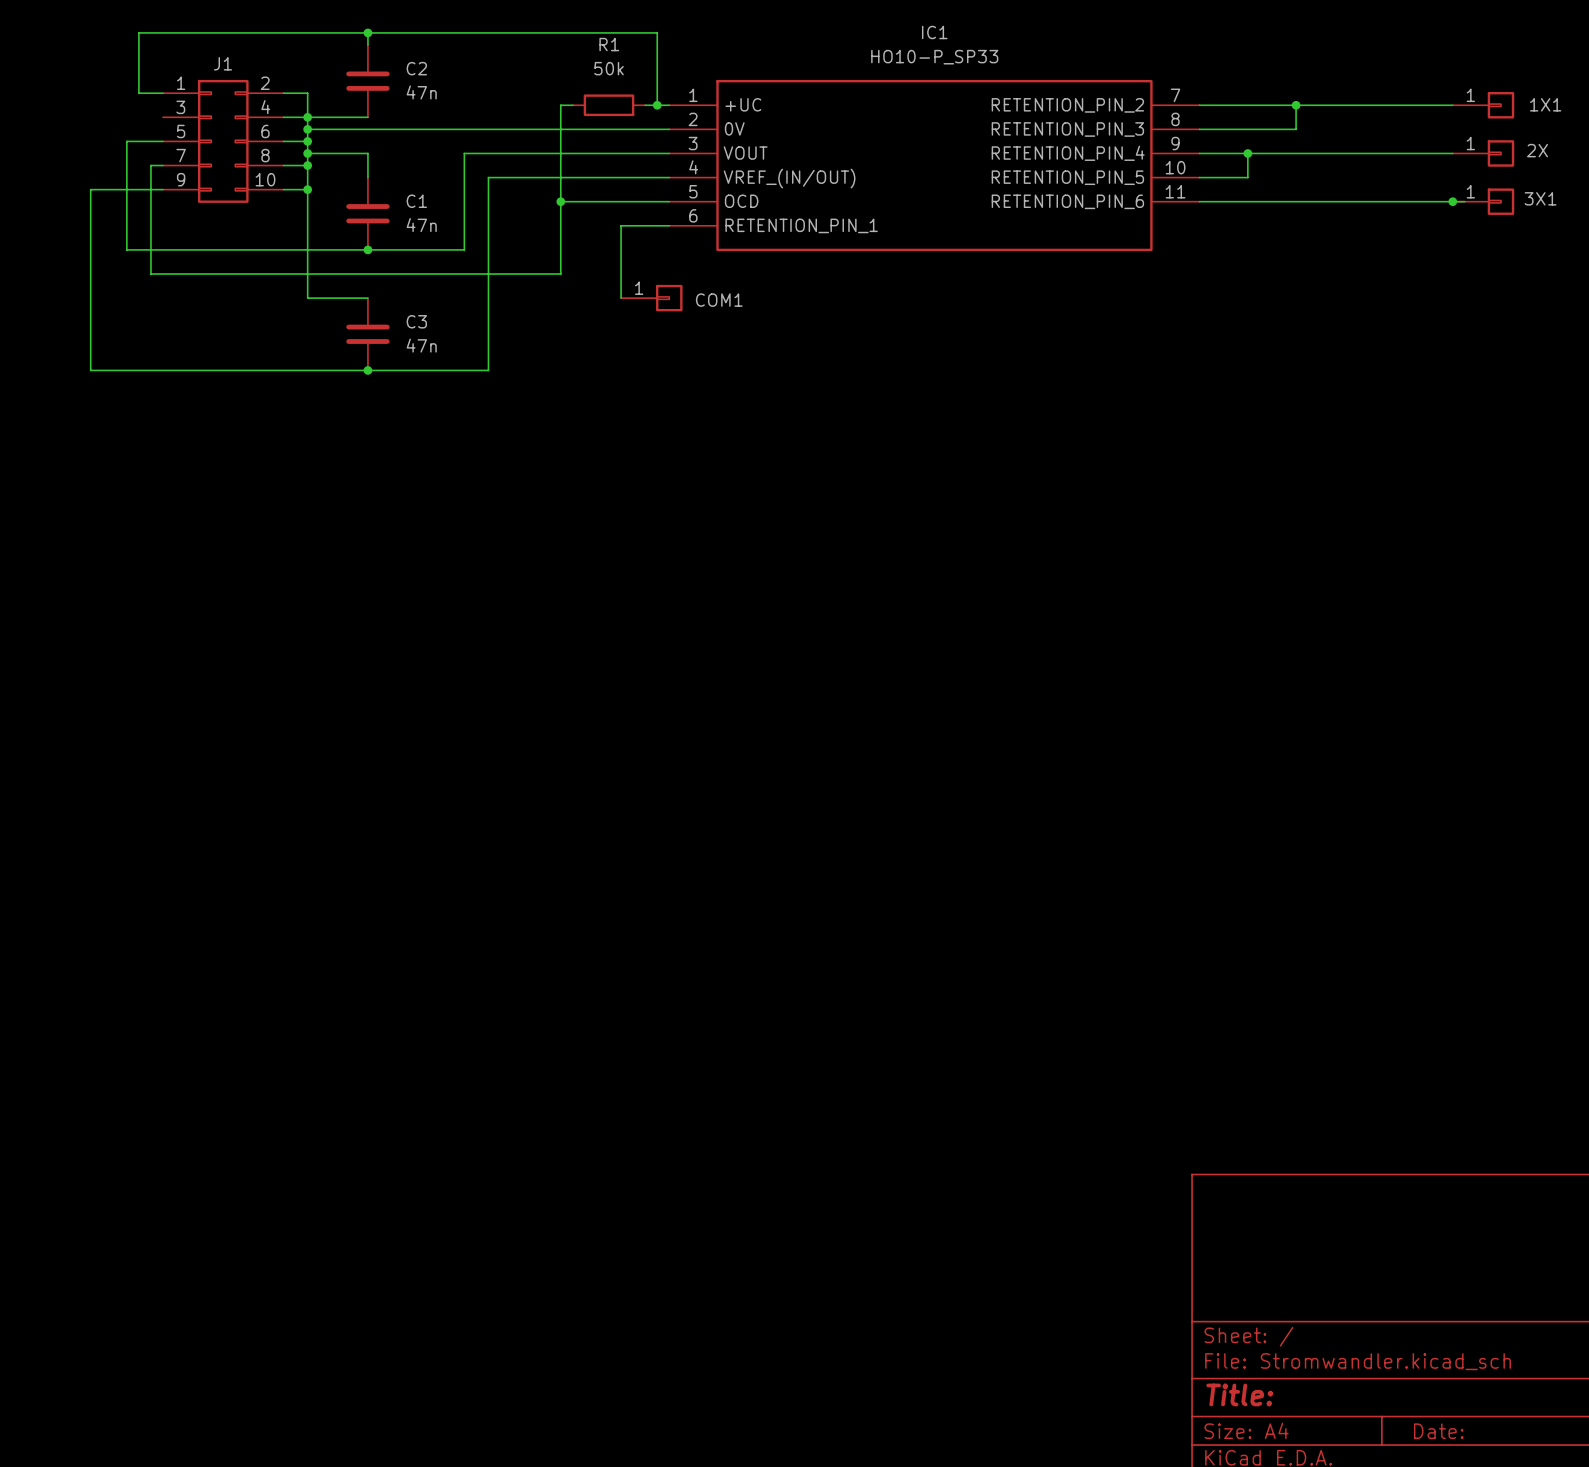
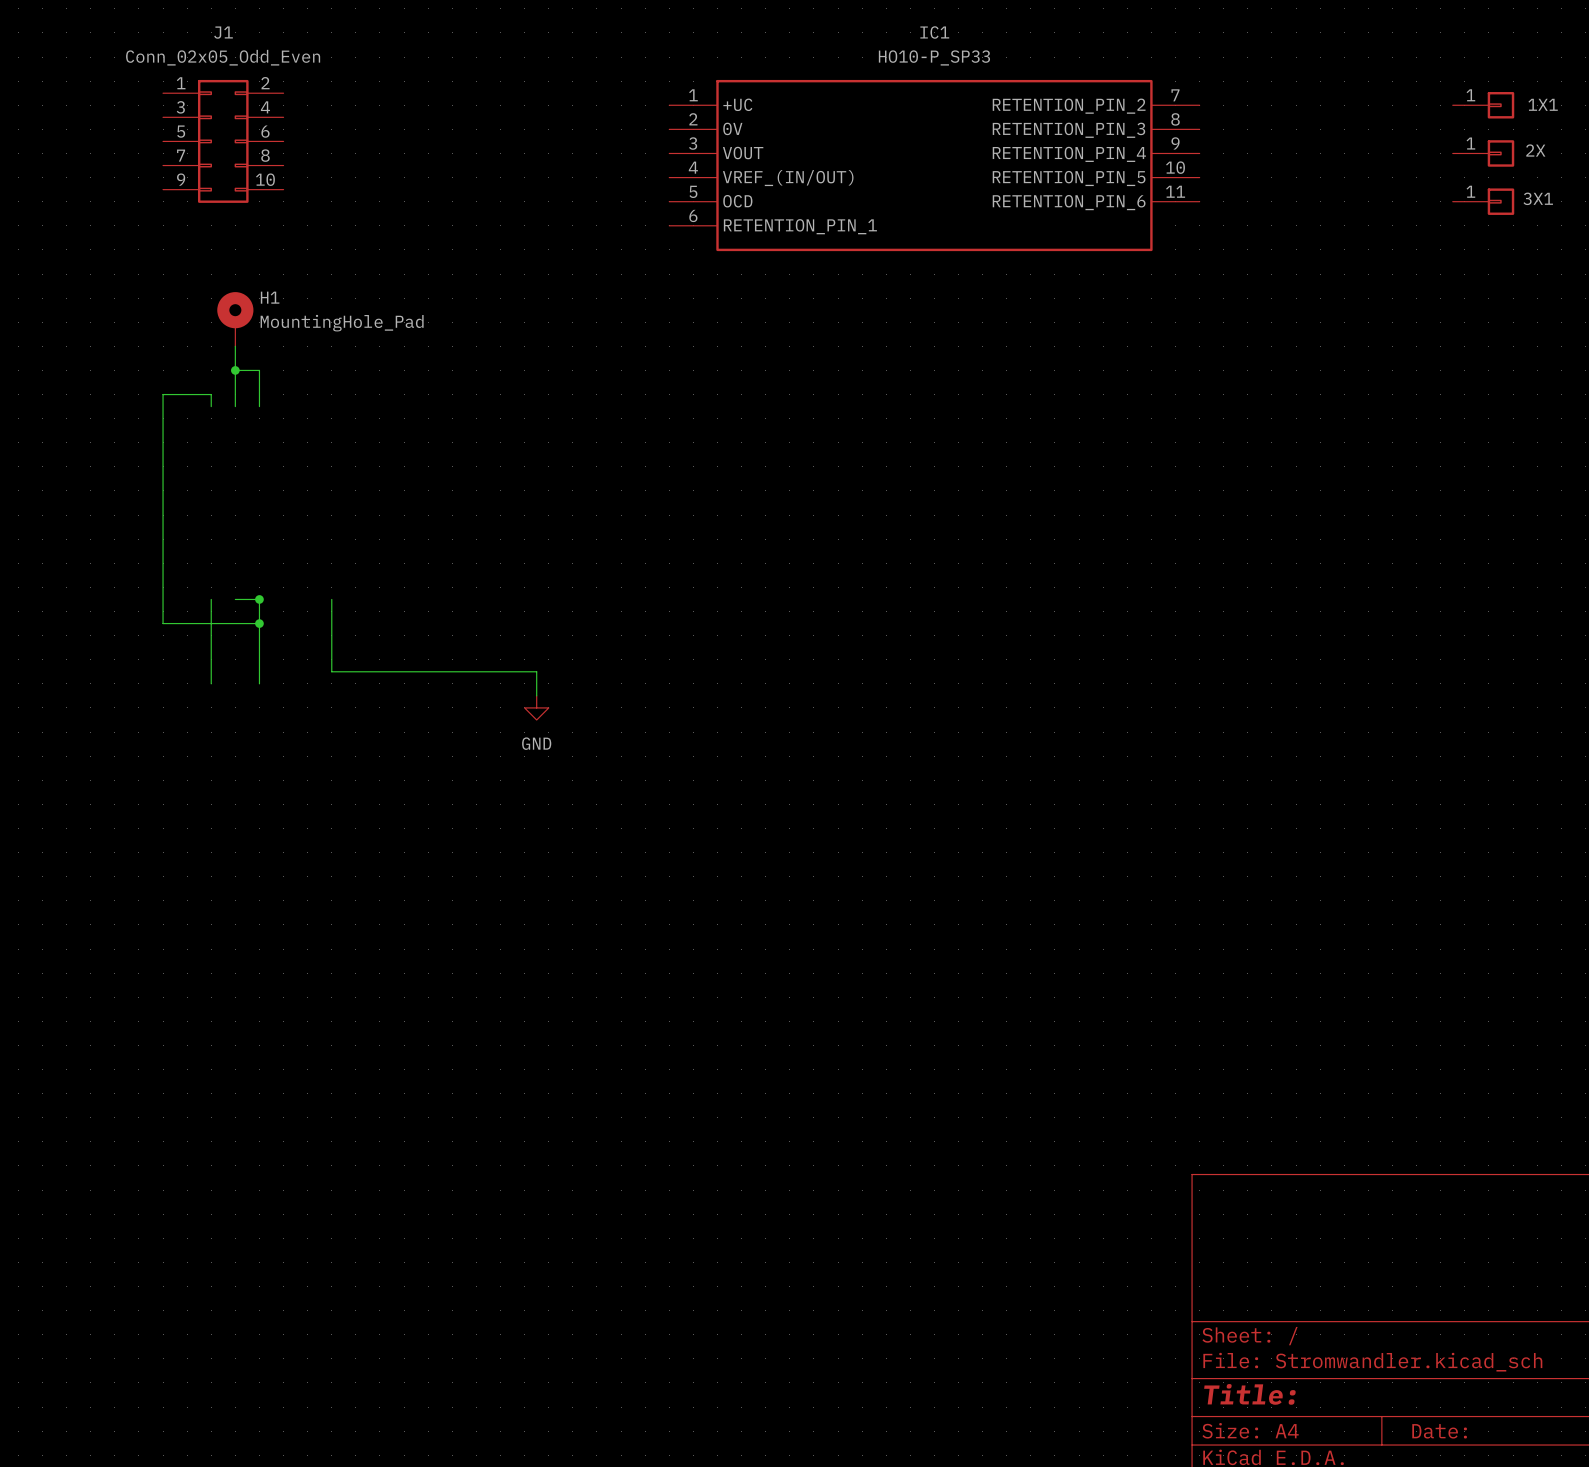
wire: (367, 32) (367, 44) -> none
junction: (367, 32) -> none
J1 value: none -> Conn_02x05_Odd_Even (223, 57)
J1 name position: J1 (223, 63) -> J1 (223, 32)
C2: 47n (367, 81) -> none
wire: (163, 93) (138, 93) (138, 32) (657, 32) (657, 105) -> none
wire: (283, 93) (307, 93) (307, 298) (367, 298) -> none
wire: (572, 105) (560, 105) (560, 274) (150, 274) (150, 165) (163, 165) -> none
R1: 50k (609, 105) -> none
wire: (645, 105) (669, 105) -> none
junction: (657, 105) -> none
wire: (1199, 105) (1452, 105) -> none
wire: (1296, 105) (1296, 129) (1199, 129) -> none
junction: (1296, 105) -> none
wire: (283, 117) (367, 117) -> none
junction: (307, 117) -> none
wire: (307, 129) (669, 129) -> none
junction: (307, 129) -> none
wire: (163, 141) (126, 141) (126, 249) (464, 249) (464, 153) (669, 153) -> none
wire: (283, 141) (307, 141) -> none
junction: (307, 141) -> none
wire: (307, 153) (367, 153) (367, 177) -> none
junction: (307, 153) -> none
wire: (1199, 153) (1452, 153) -> none
wire: (1247, 153) (1247, 177) (1199, 177) -> none
junction: (1247, 153) -> none
wire: (283, 165) (307, 165) -> none
junction: (307, 165) -> none
wire: (669, 177) (488, 177) (488, 370) (259, 370) -> (259, 406) (259, 370)
wire: (163, 189) (90, 189) (90, 370) (235, 370) -> none
wire: (283, 189) (307, 189) -> none
junction: (307, 189) -> none
wire: (560, 201) (669, 201) -> none
junction: (560, 201) -> none
wire: (1199, 201) (1464, 201) -> none
junction: (1452, 201) -> none
C1: 47n (367, 213) -> none
wire: (669, 225) (621, 225) (621, 298) -> none
junction: (367, 249) -> none
COM1: (651, 298) -> none
H1: none -> MountingHole_Pad (235, 319)
C3: 47n (367, 334) -> none
wire: none -> (235, 346) (235, 406)
junction: none -> (235, 370)
junction: (367, 370) -> none
wire: none -> (211, 406) (211, 394) (163, 394) (163, 623) (259, 623)
wire: none -> (211, 599) (211, 683)
wire: none -> (235, 599) (259, 599) (259, 683)
junction: none -> (259, 599)
wire: none -> (331, 599) (331, 671) (536, 671) (536, 695)
junction: none -> (259, 623)
power symbol: none -> GND (536, 707)

